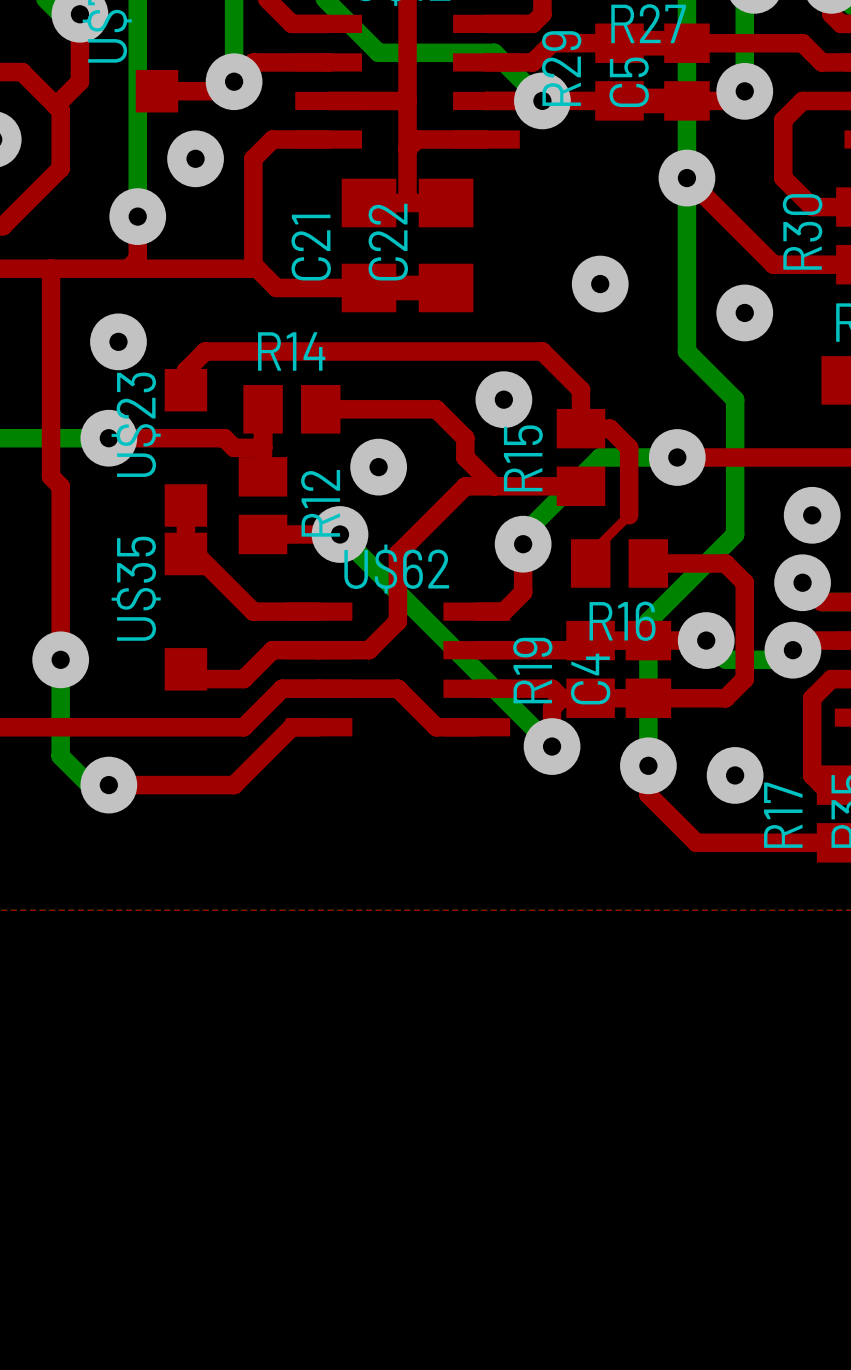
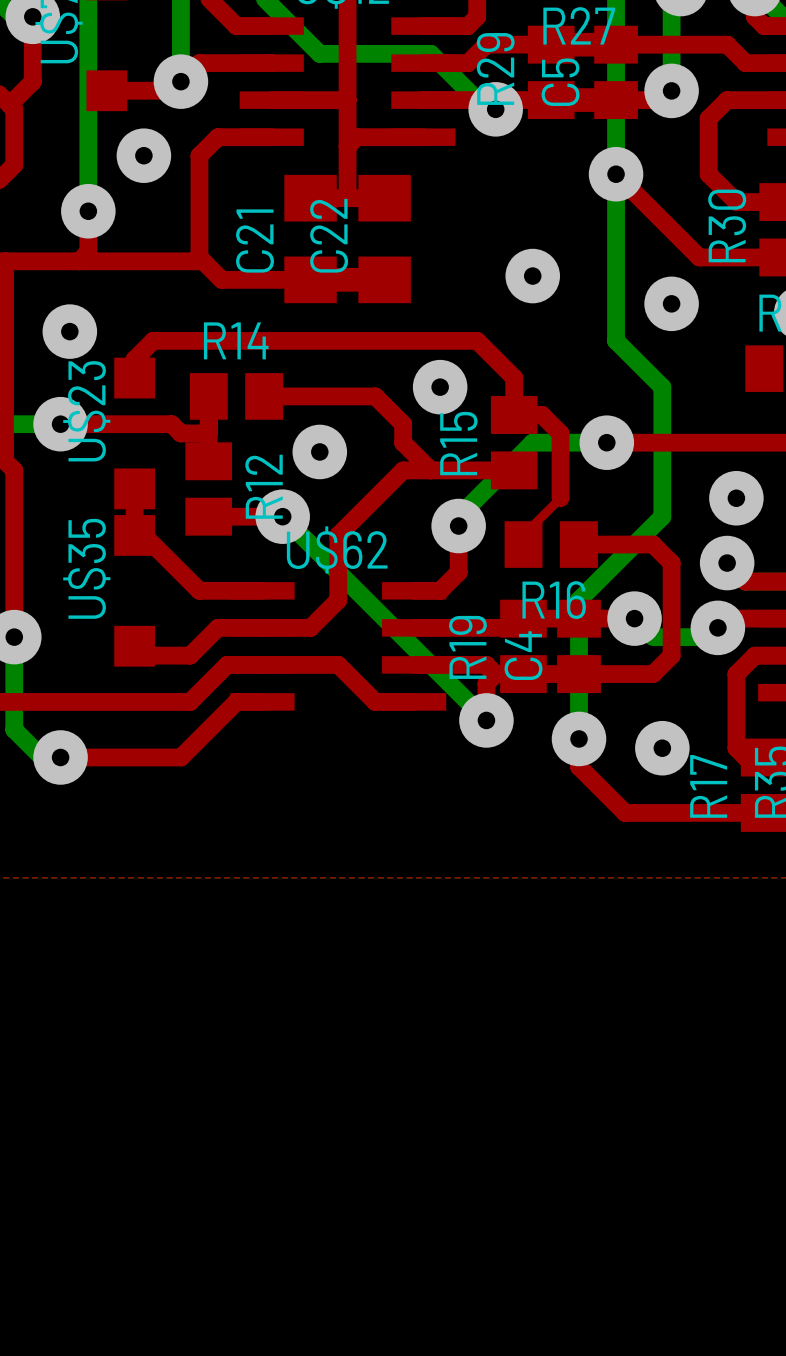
via position: (542, 100) -> (495, 109)

